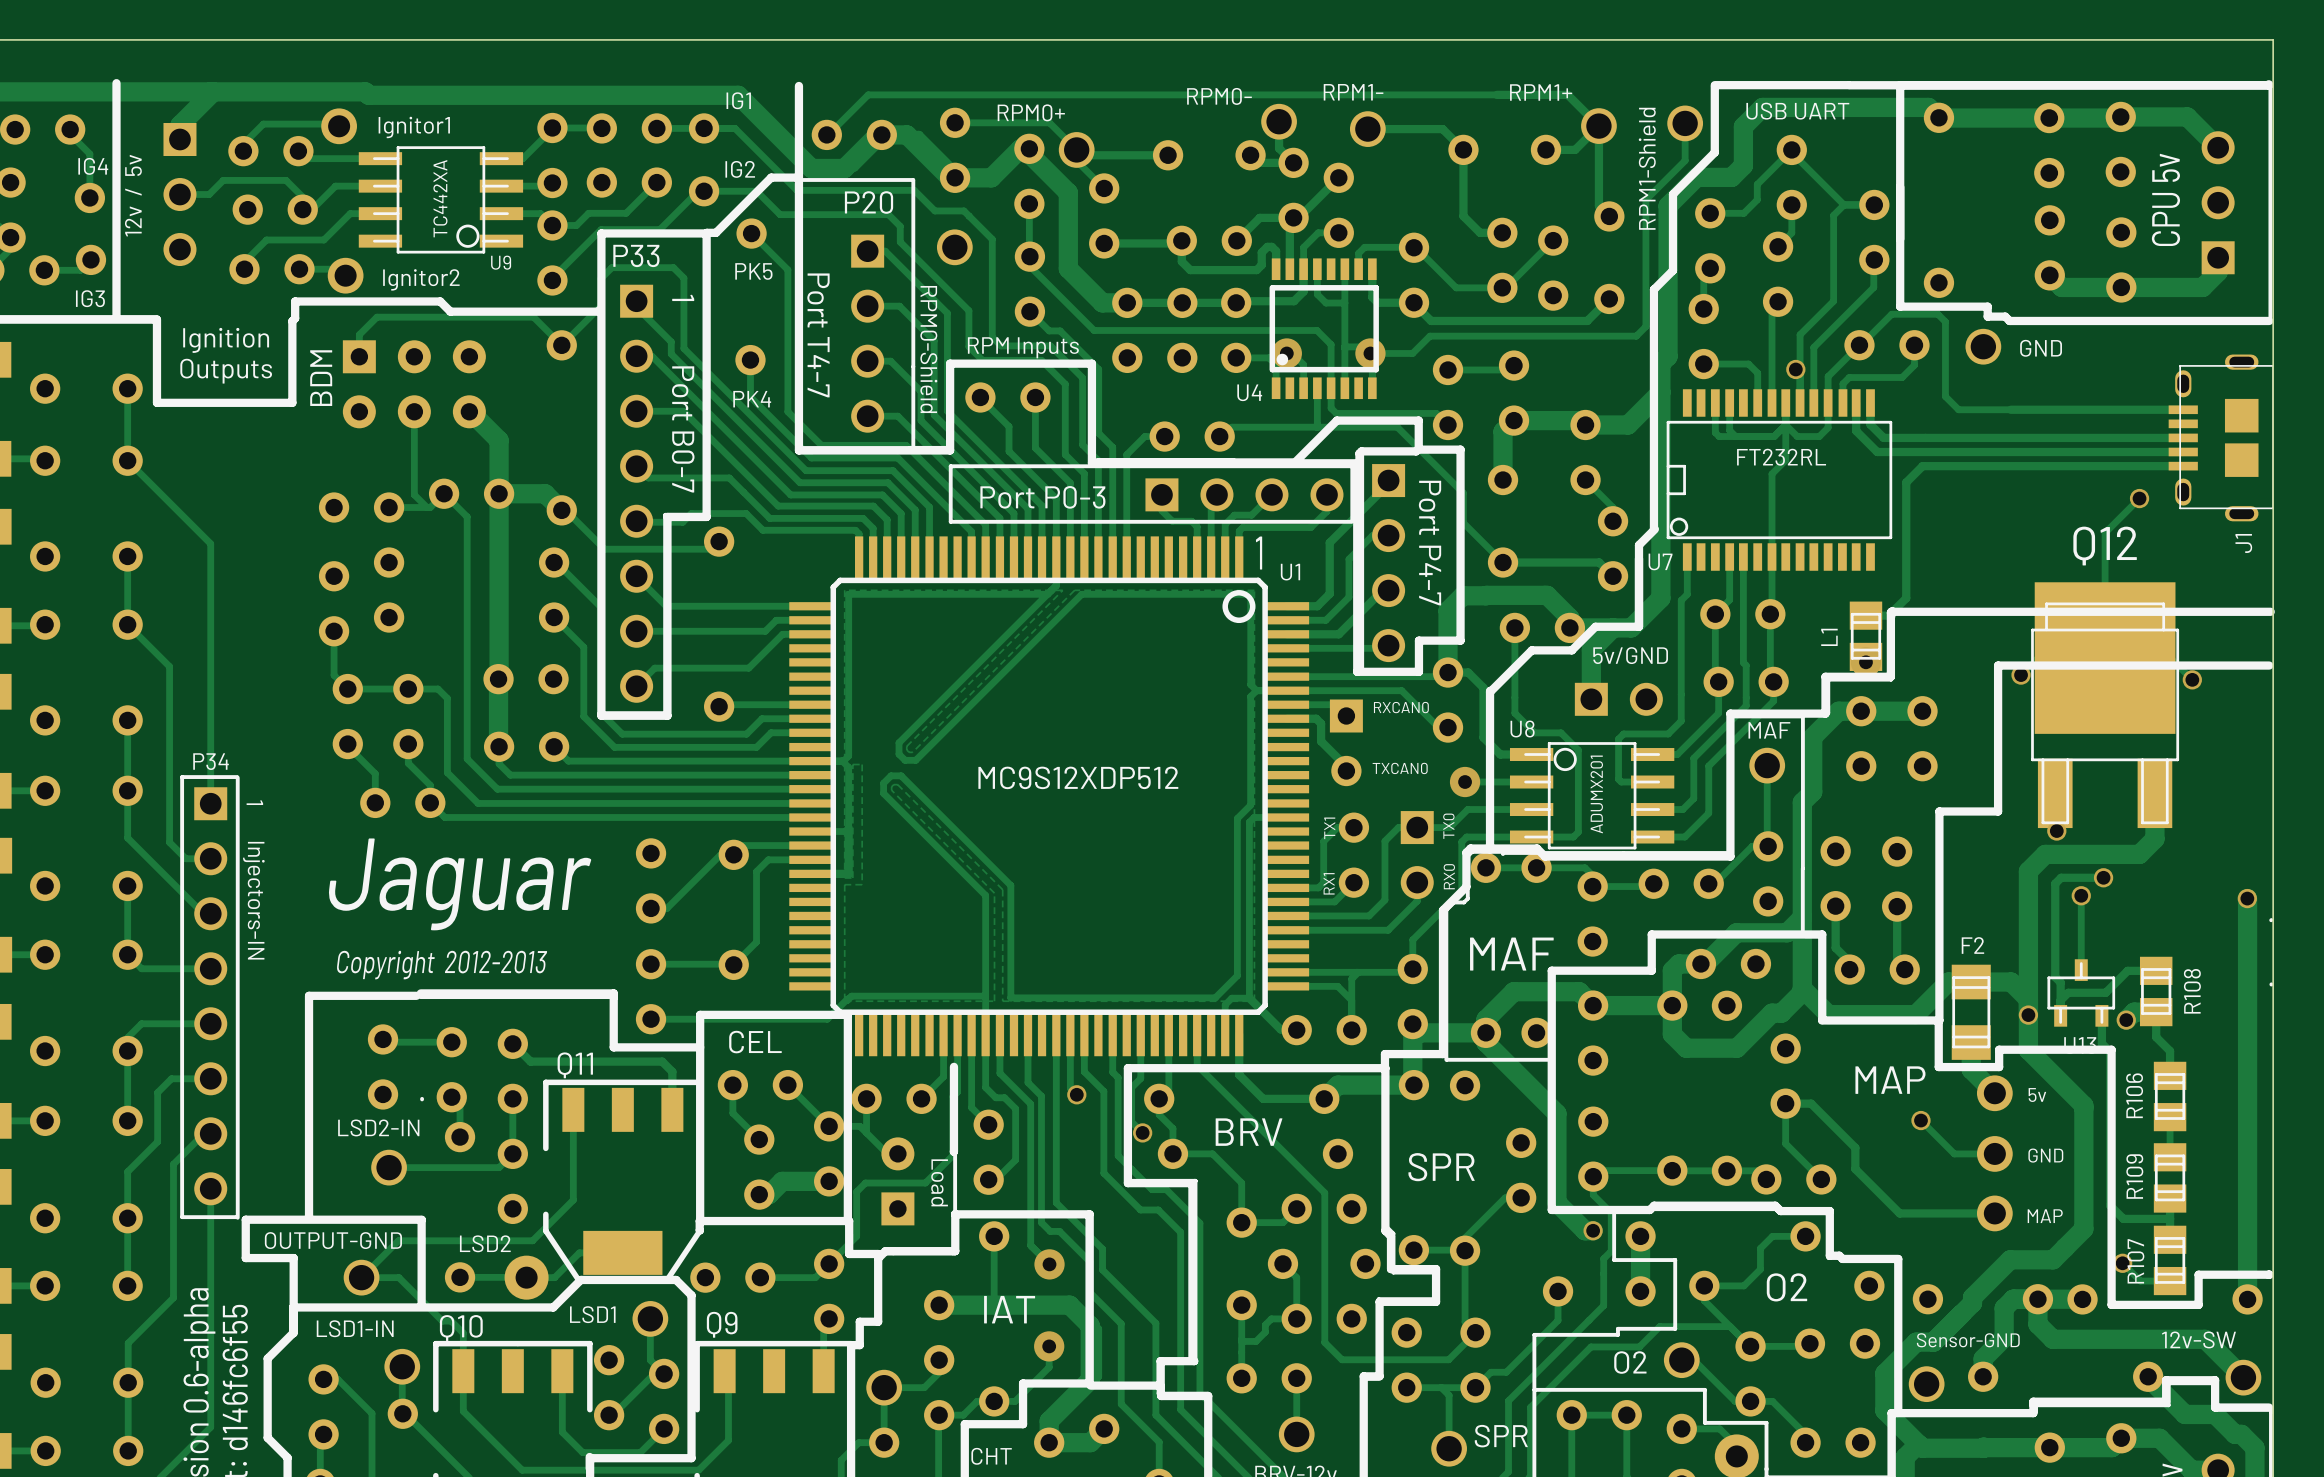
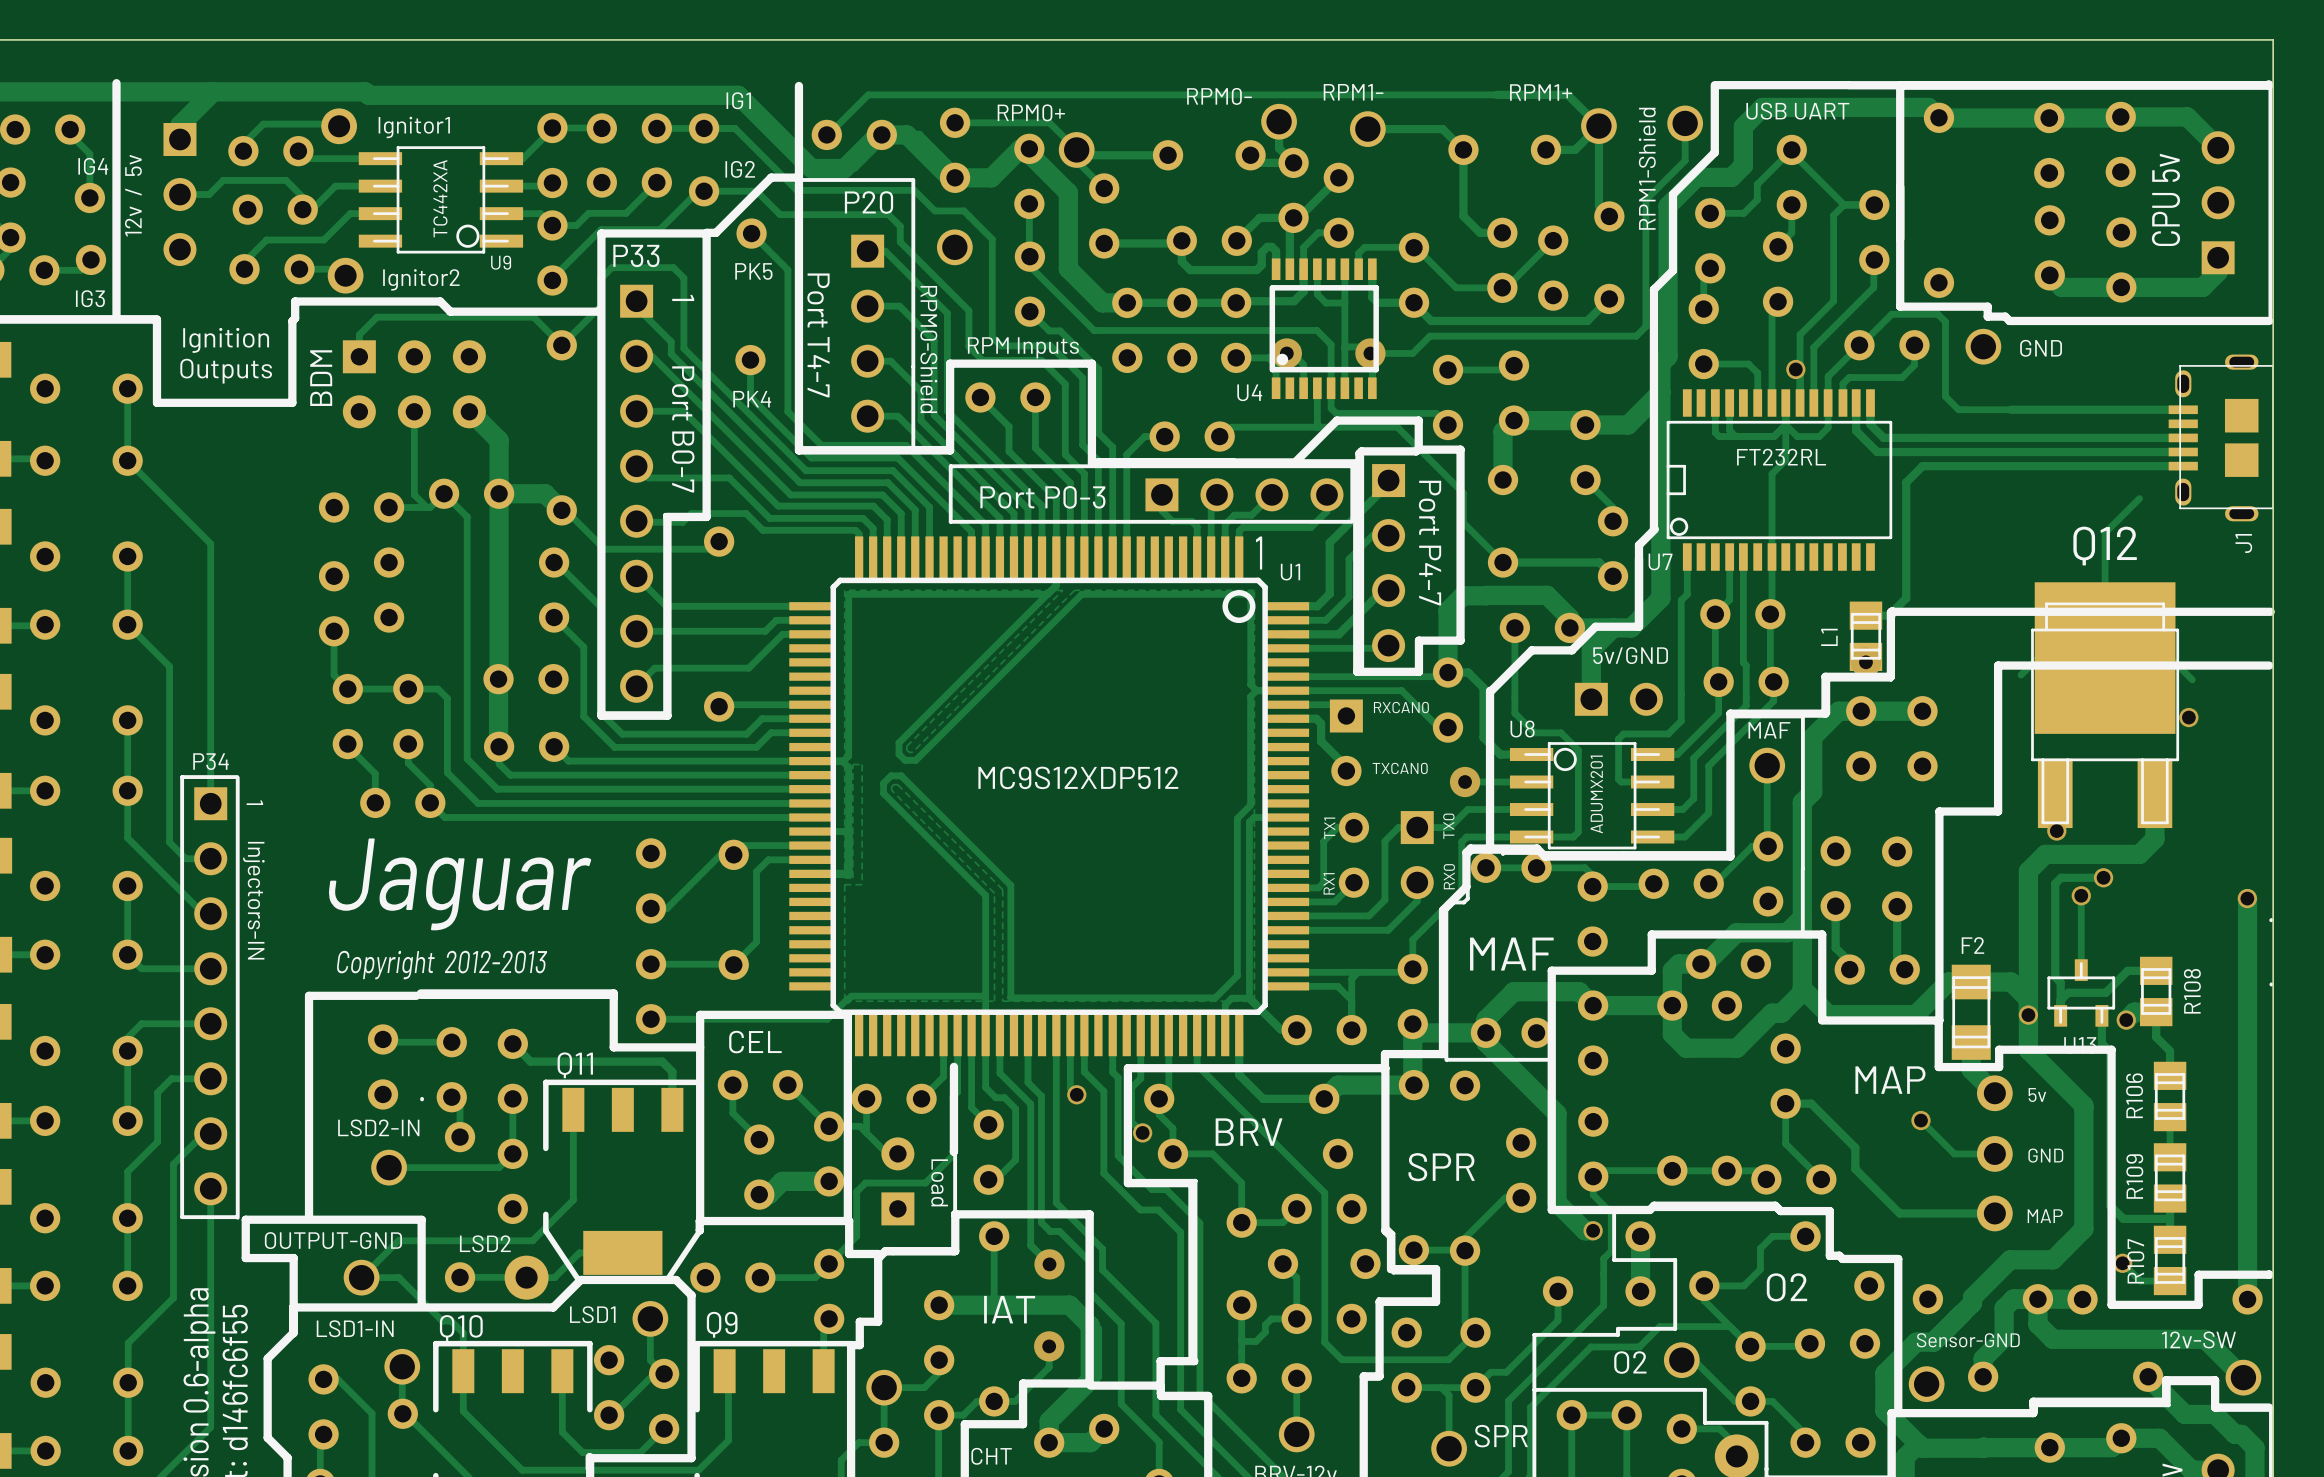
via: (2139, 498) -> none
via: (2021, 675) -> none
via position: (2192, 679) -> (2188, 717)

